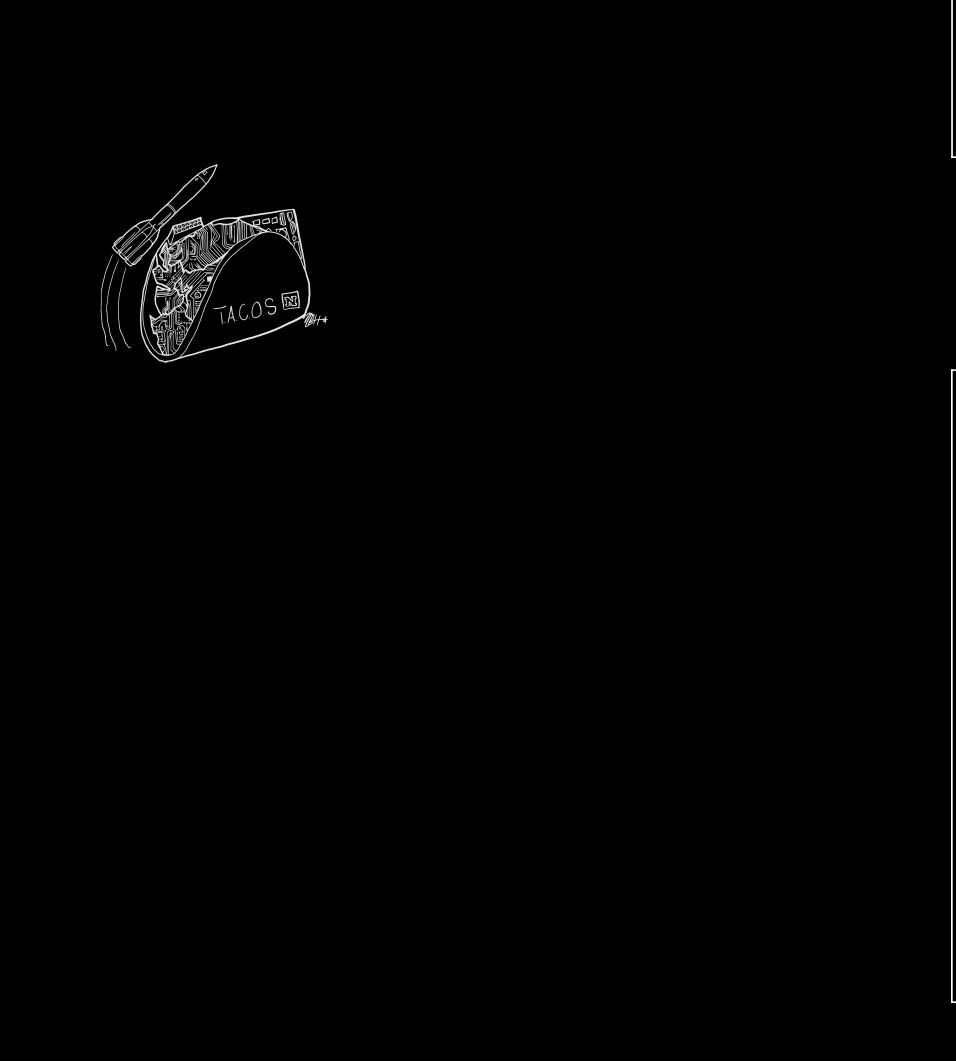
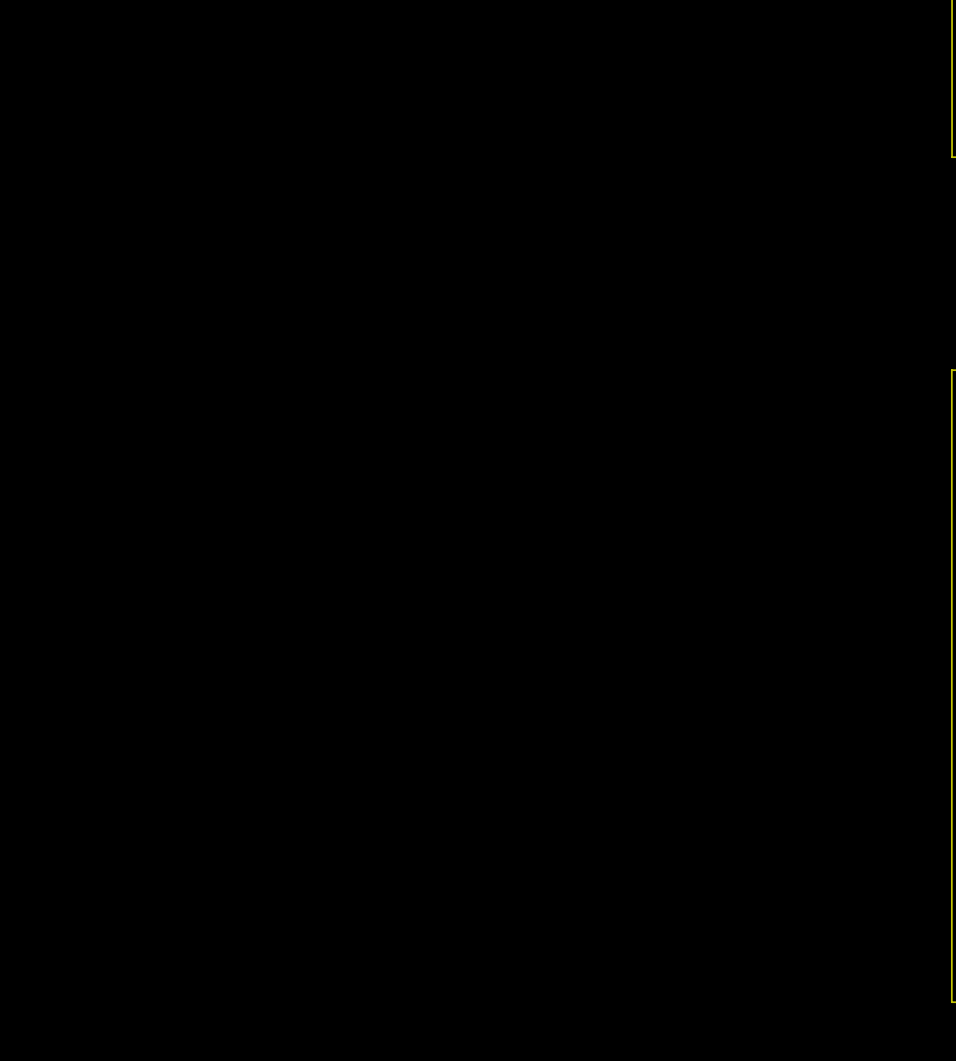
drawing: [100, 164, 328, 363] -> none

